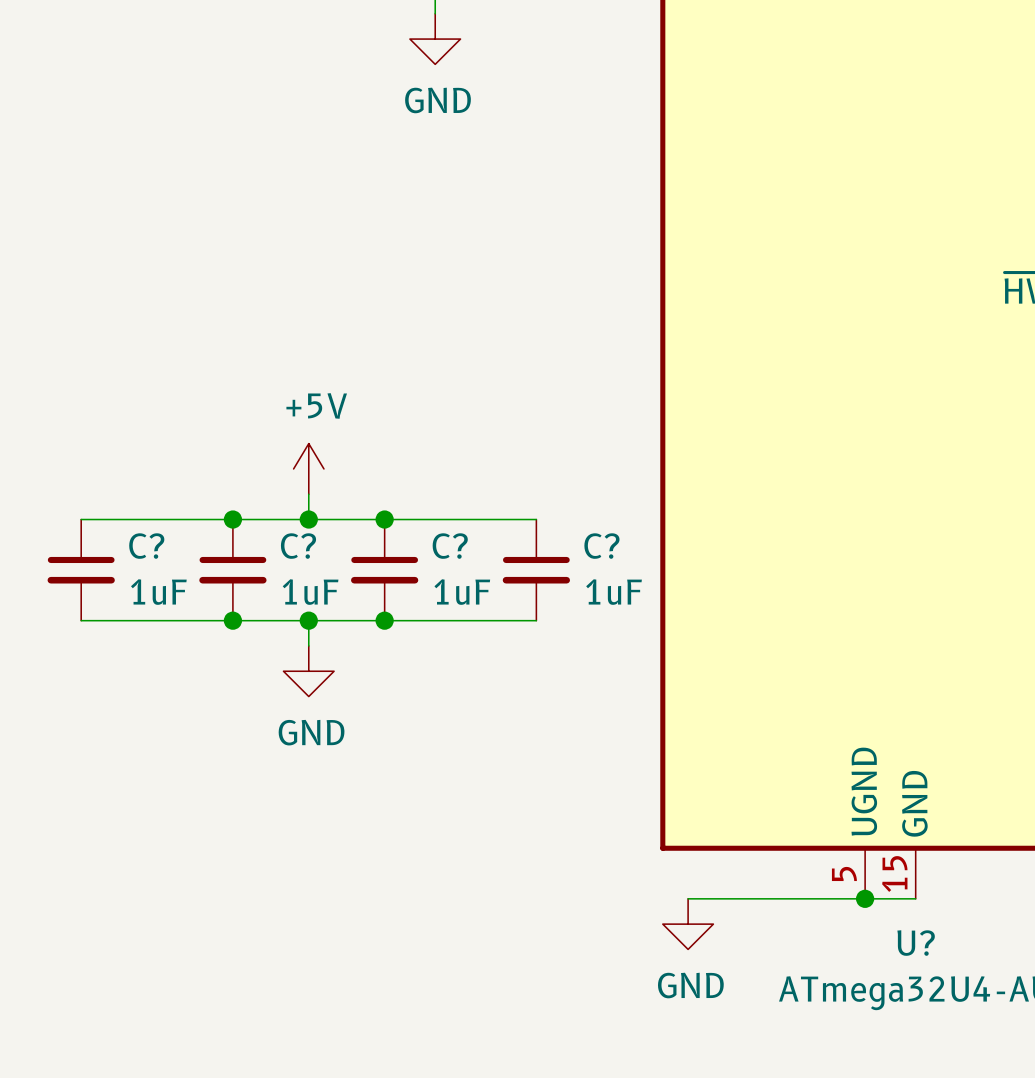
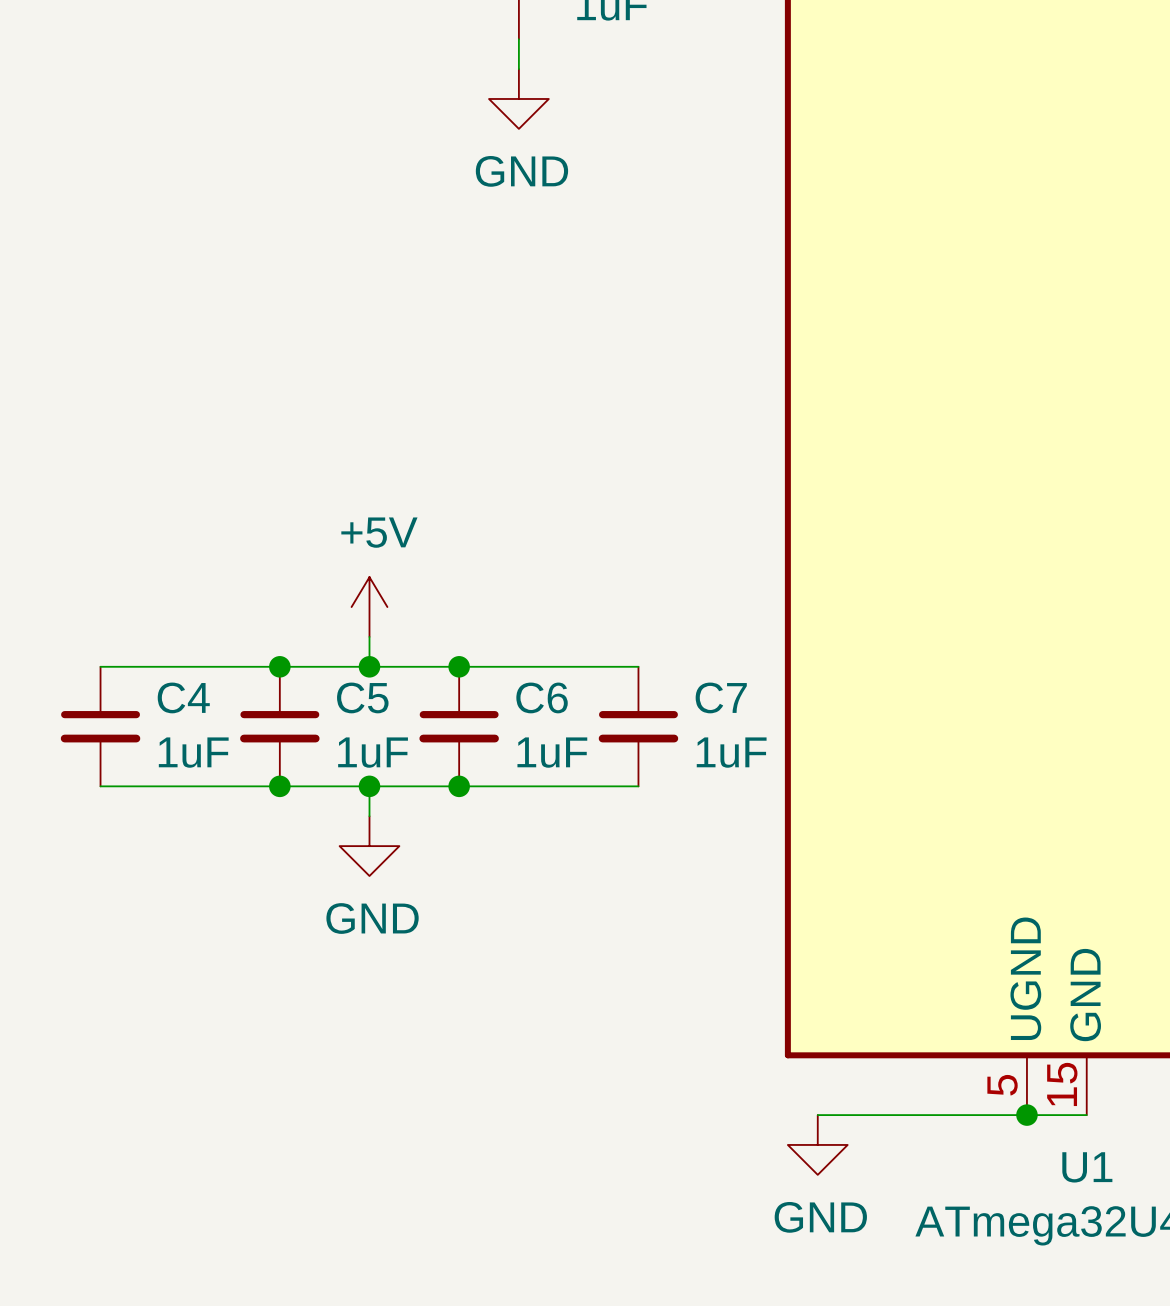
C? name: C? (146, 546) -> C4 (183, 697)
C? name: C? (298, 546) -> C5 (362, 697)
C? name: C? (450, 546) -> C6 (542, 697)
C? name: C? (601, 546) -> C7 (721, 697)
U? name: U? (916, 943) -> U1 (1087, 1167)

